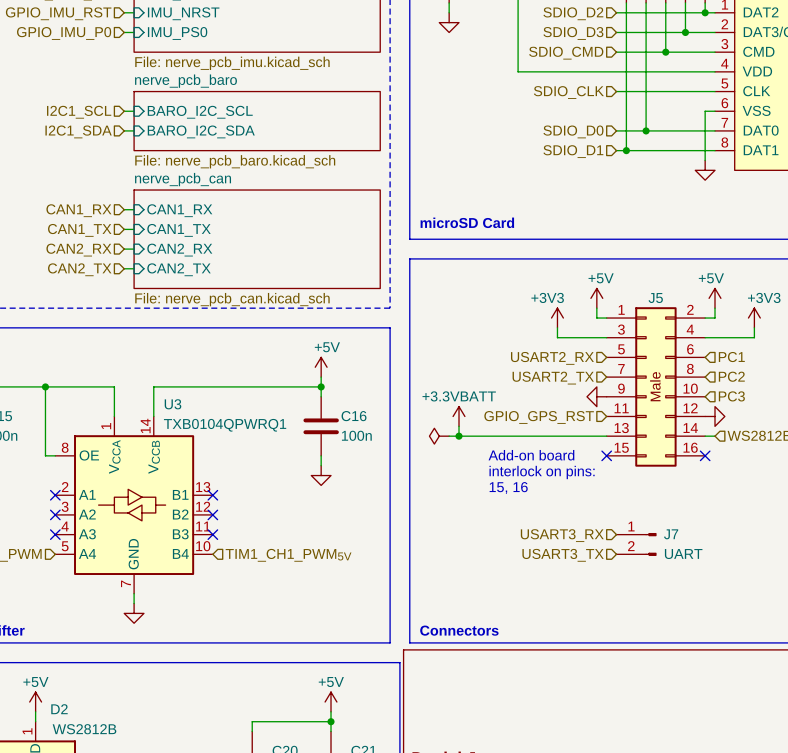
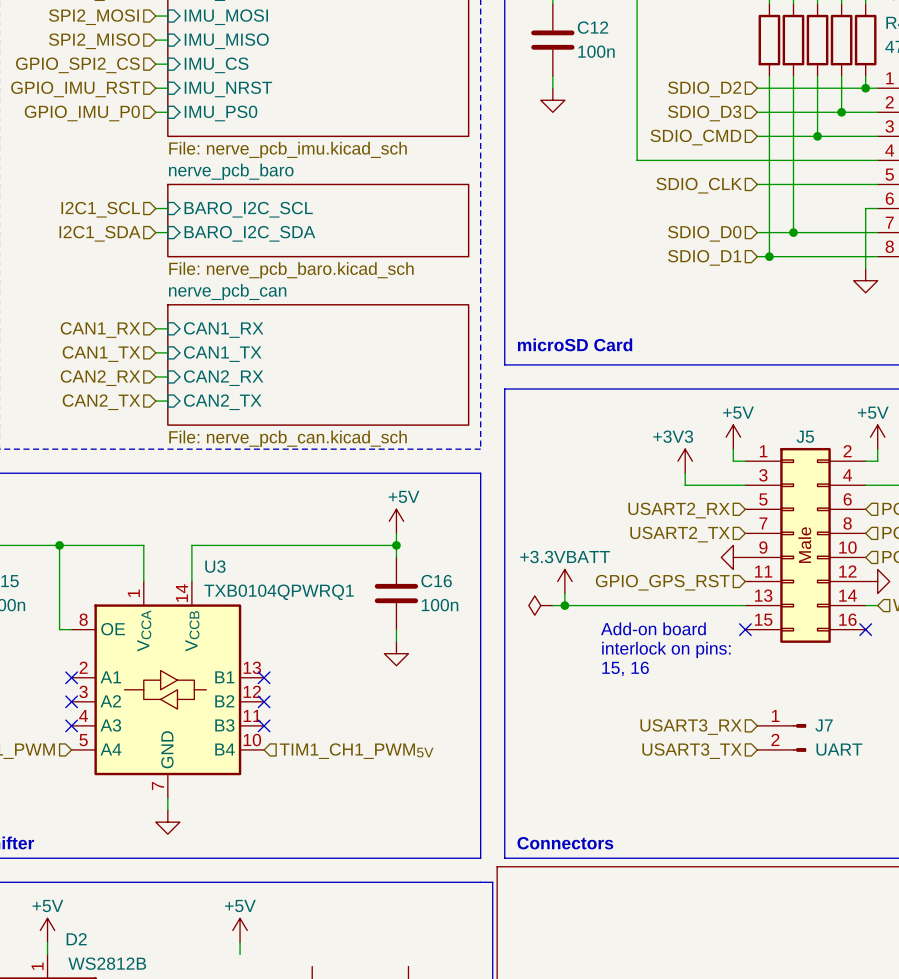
power symbol position: +5V (331, 702) -> +5V (240, 930)
wire: none -> (240, 942) (240, 954)
wire: (331, 711) (331, 731) -> none
wire: (331, 721) (252, 721) (252, 731) -> none
junction: (331, 721) -> none

